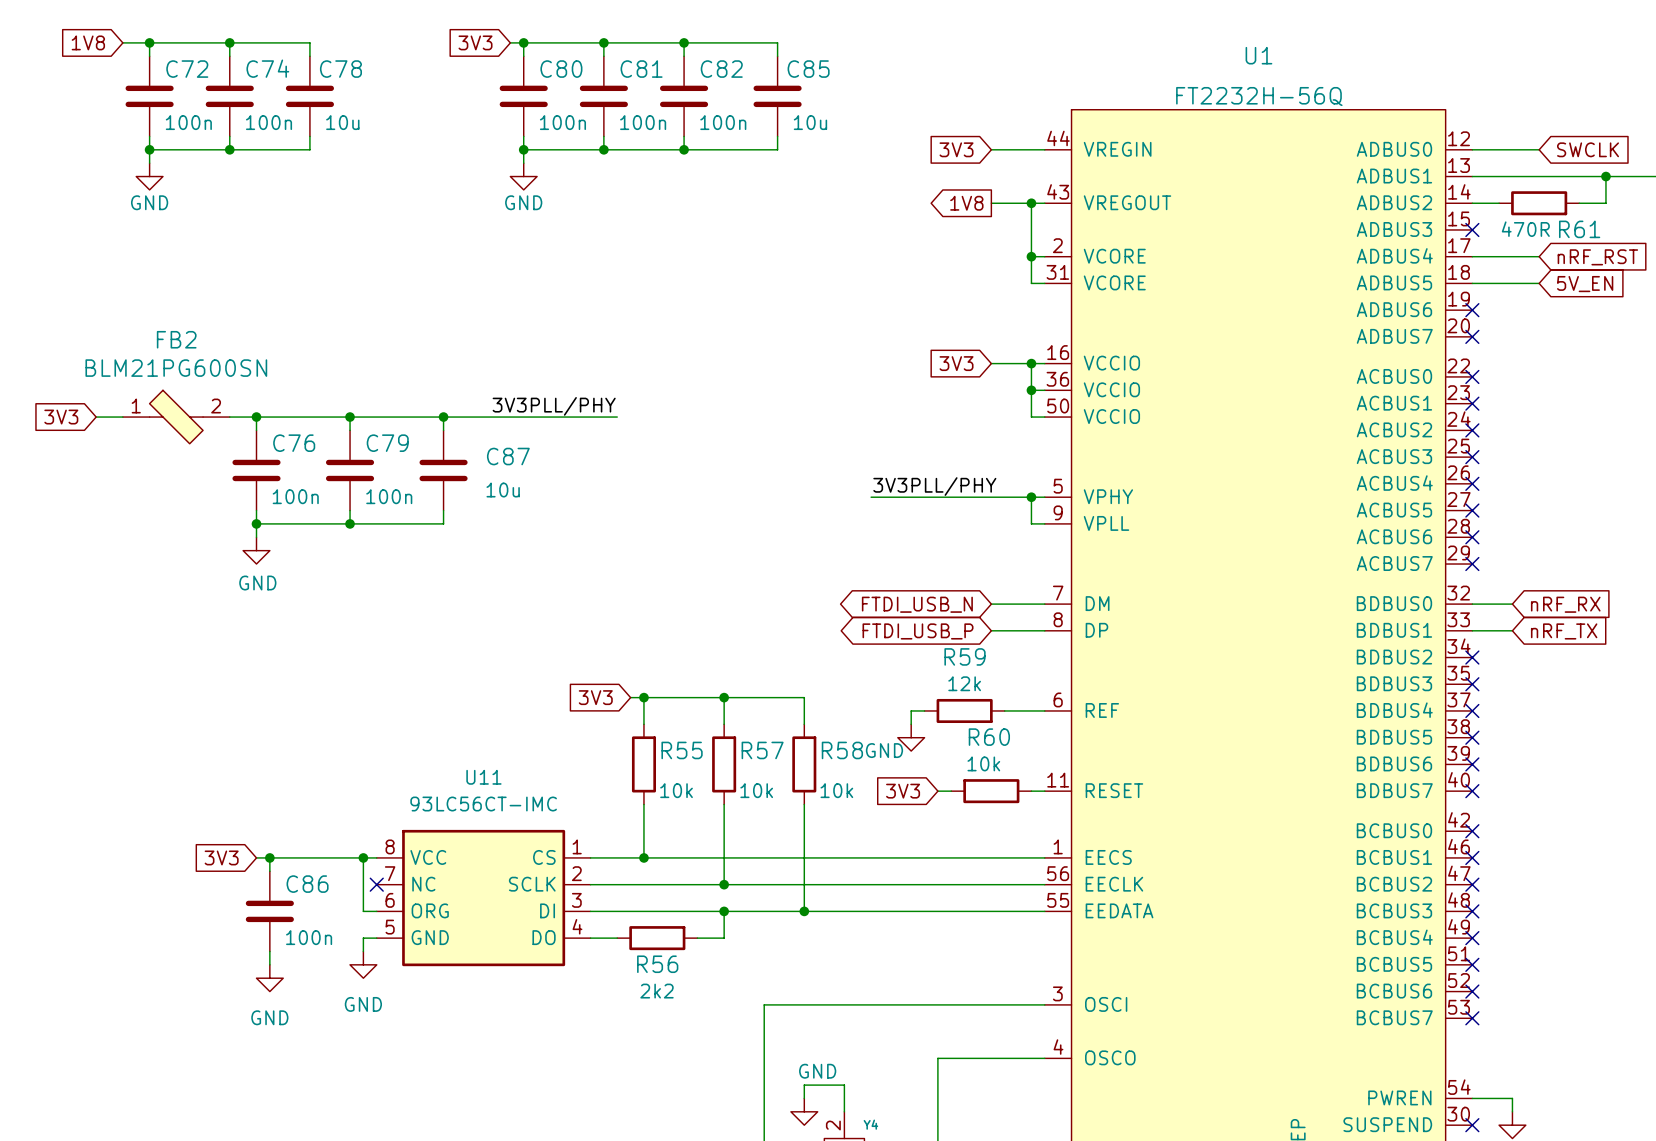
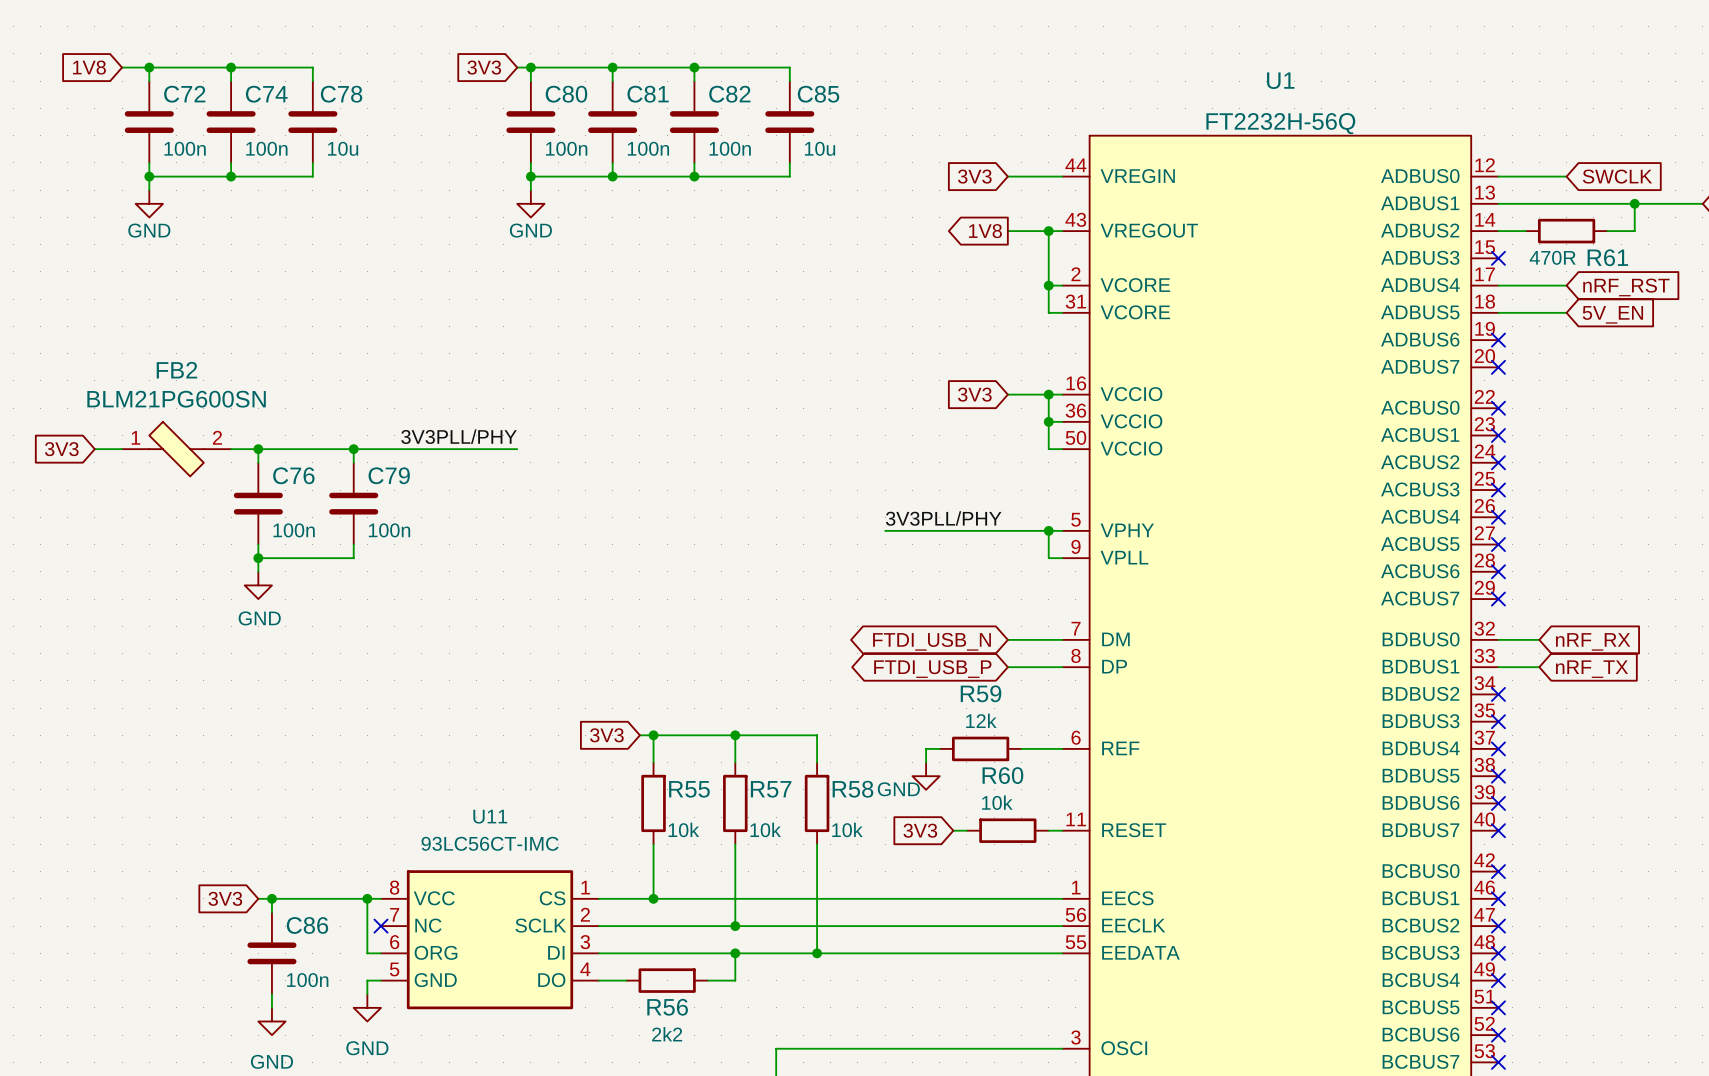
label position: 3V3PLL/PHY (554, 406) -> 3V3PLL/PHY (459, 436)
wire: (443, 417) (443, 430) -> none
junction: (443, 417) -> none
wire: (510, 417) (617, 417) -> none
C87: (443, 470) -> none
wire: (443, 510) (443, 523) (350, 523) -> none
junction: (350, 523) -> none

